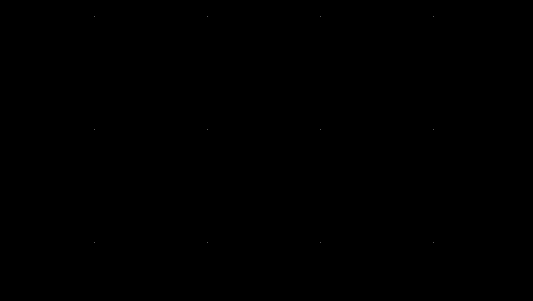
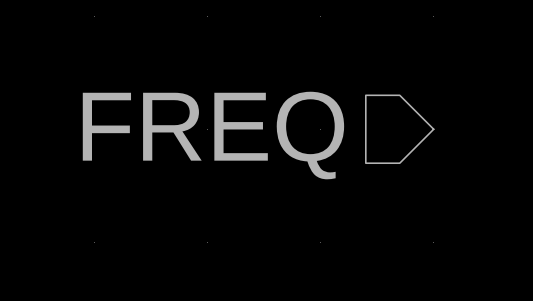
hierarchical label: none -> FREQ (213, 135)

